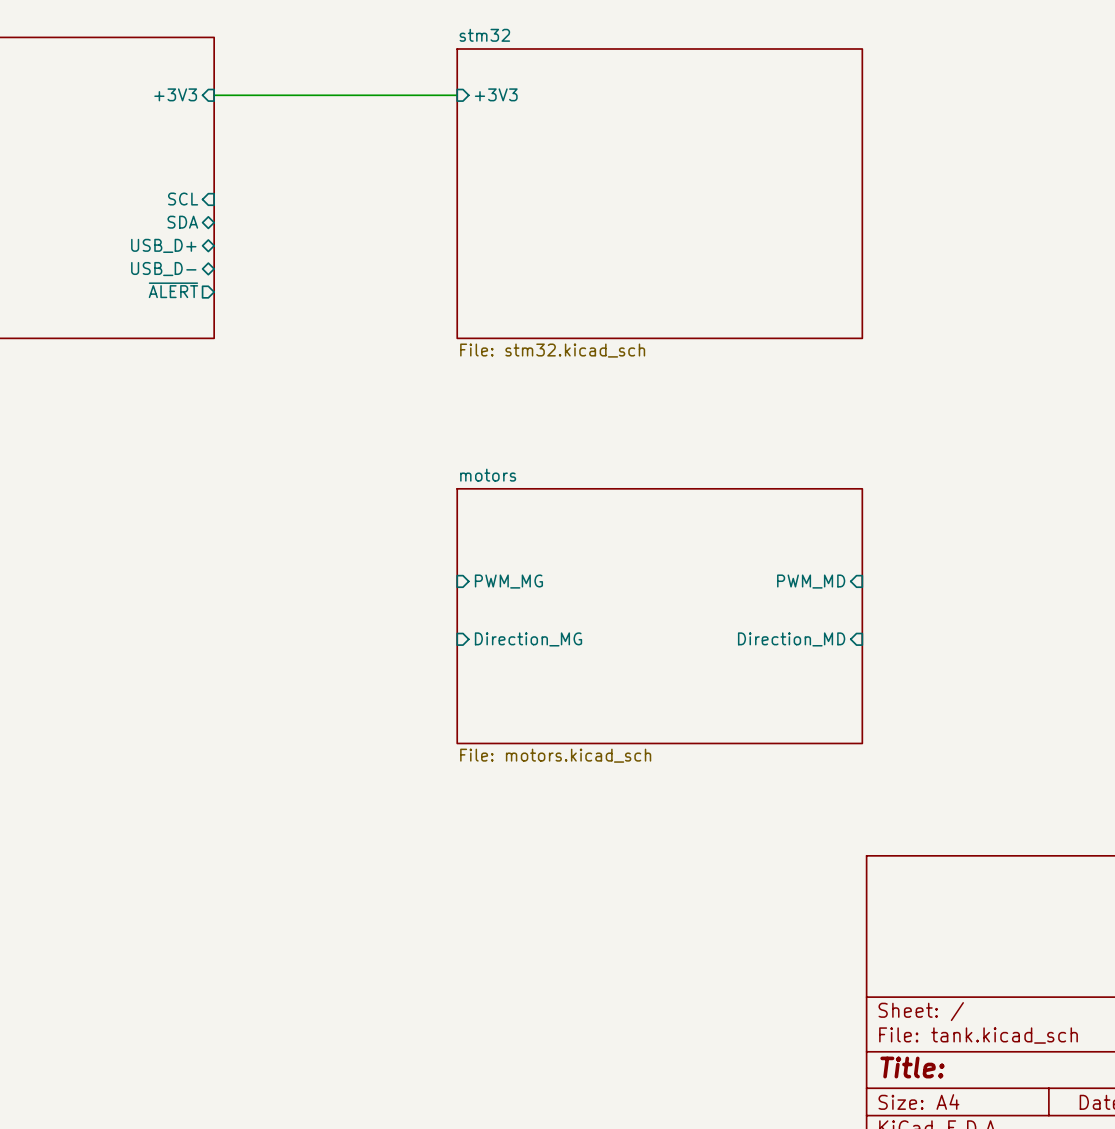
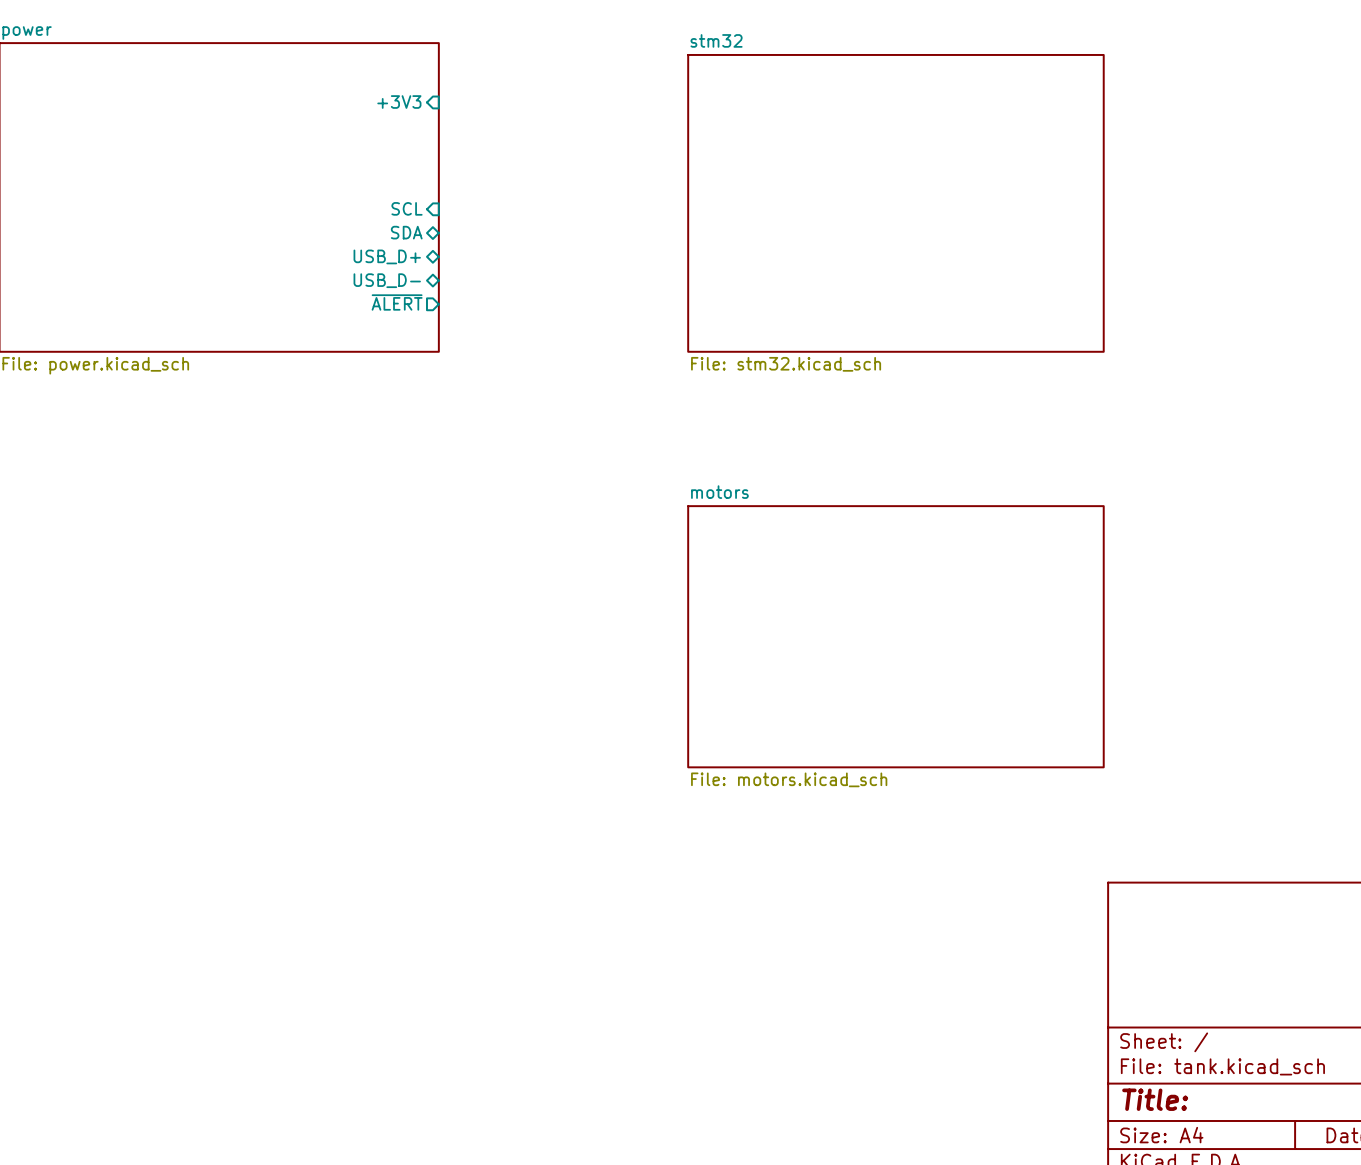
sheet pin: +3V3 (496, 94) -> none
wire: (214, 95) (457, 95) -> none
sheet pin: PWM_MG (508, 581) -> none
sheet pin: PWM_MD (811, 581) -> none
sheet pin: Direction_MG (528, 639) -> none
sheet pin: Direction_MD (791, 639) -> none

